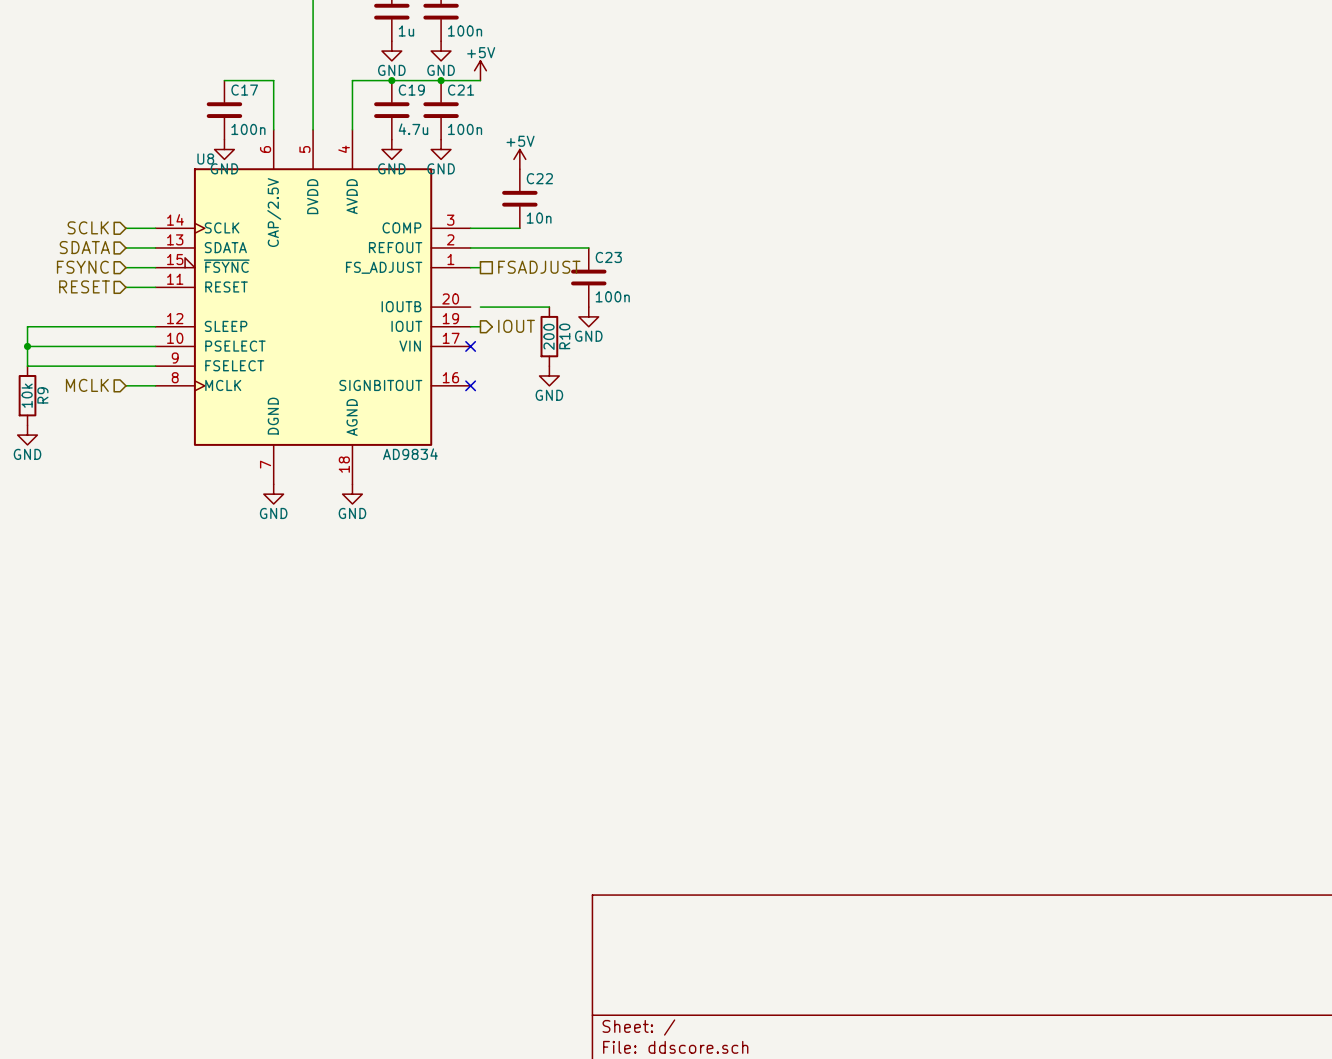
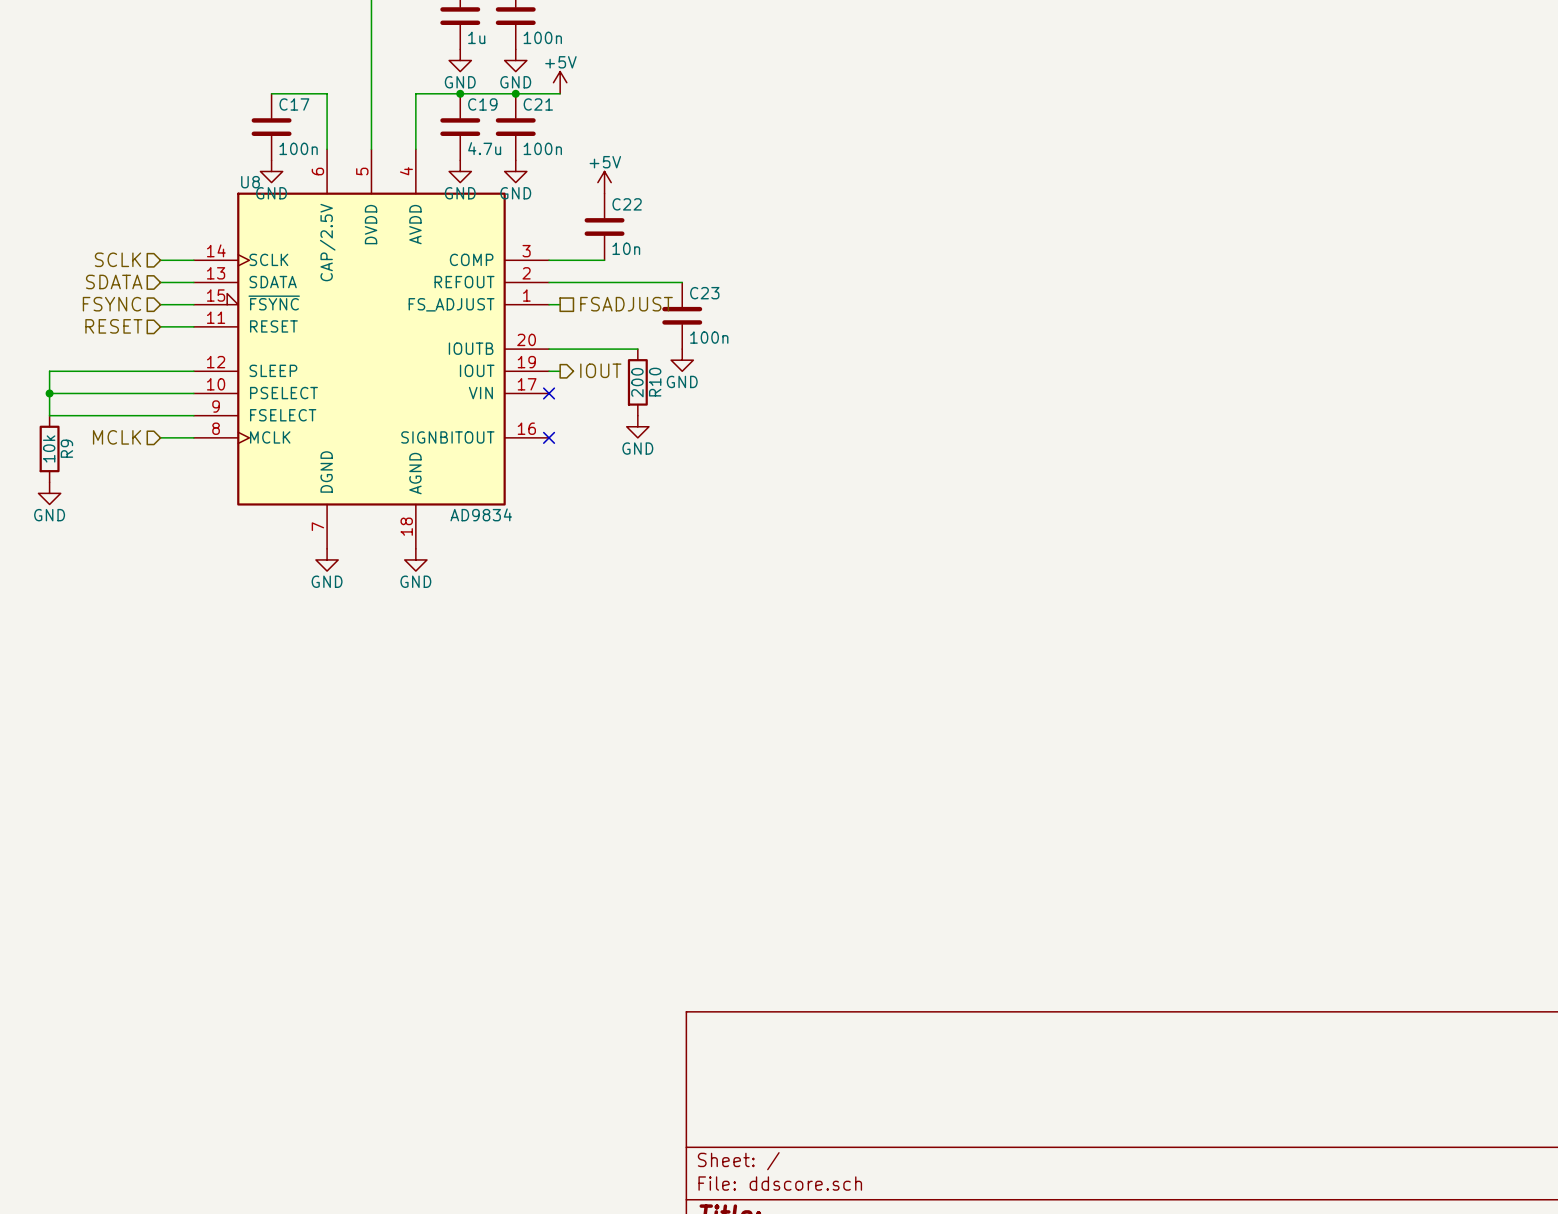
wire: none -> (549, 349) (560, 349)

